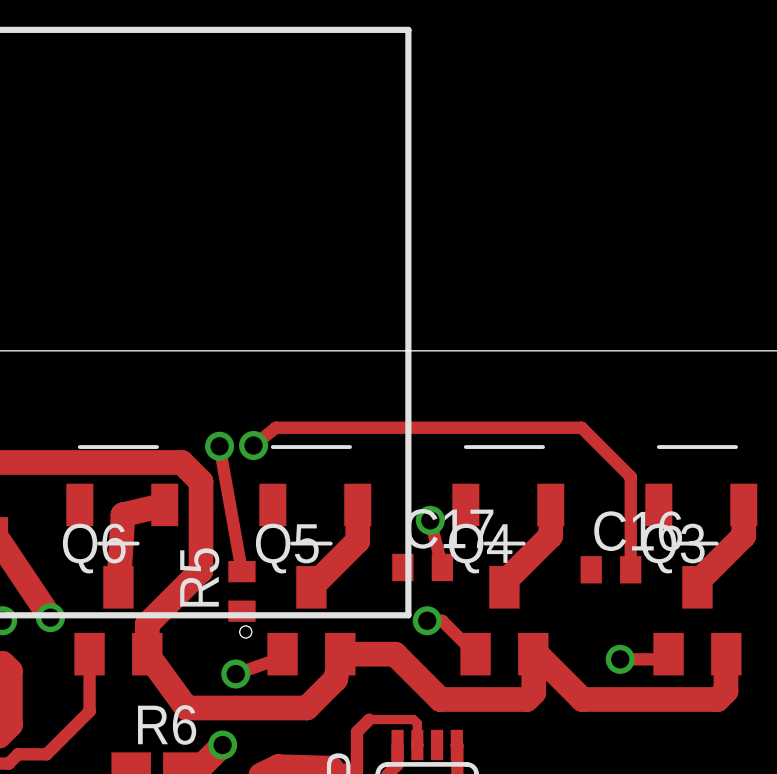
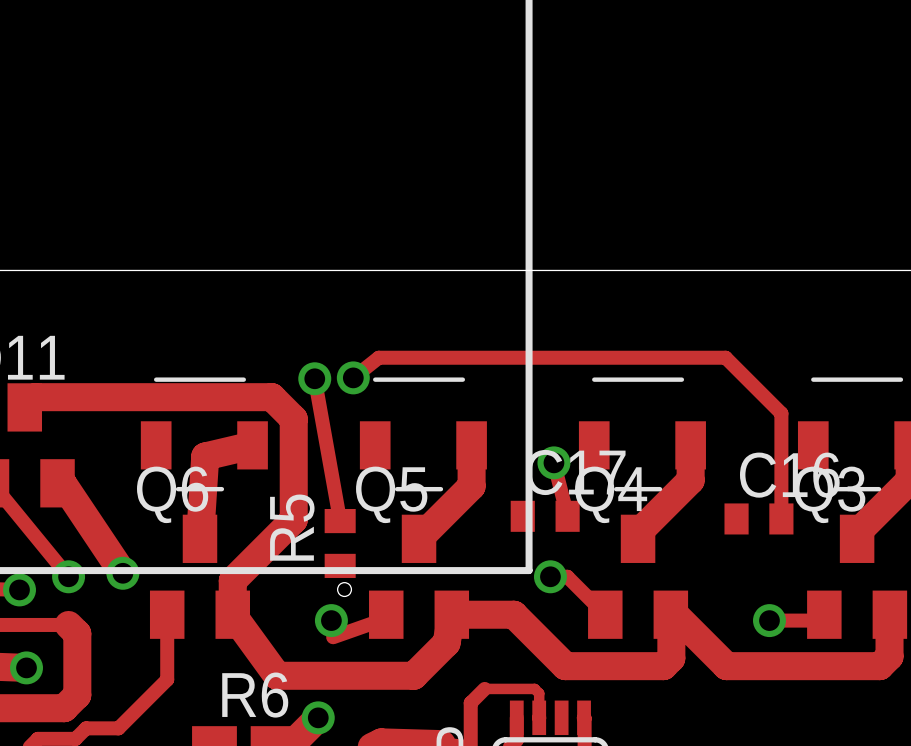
via position: (235, 674) -> (331, 620)

